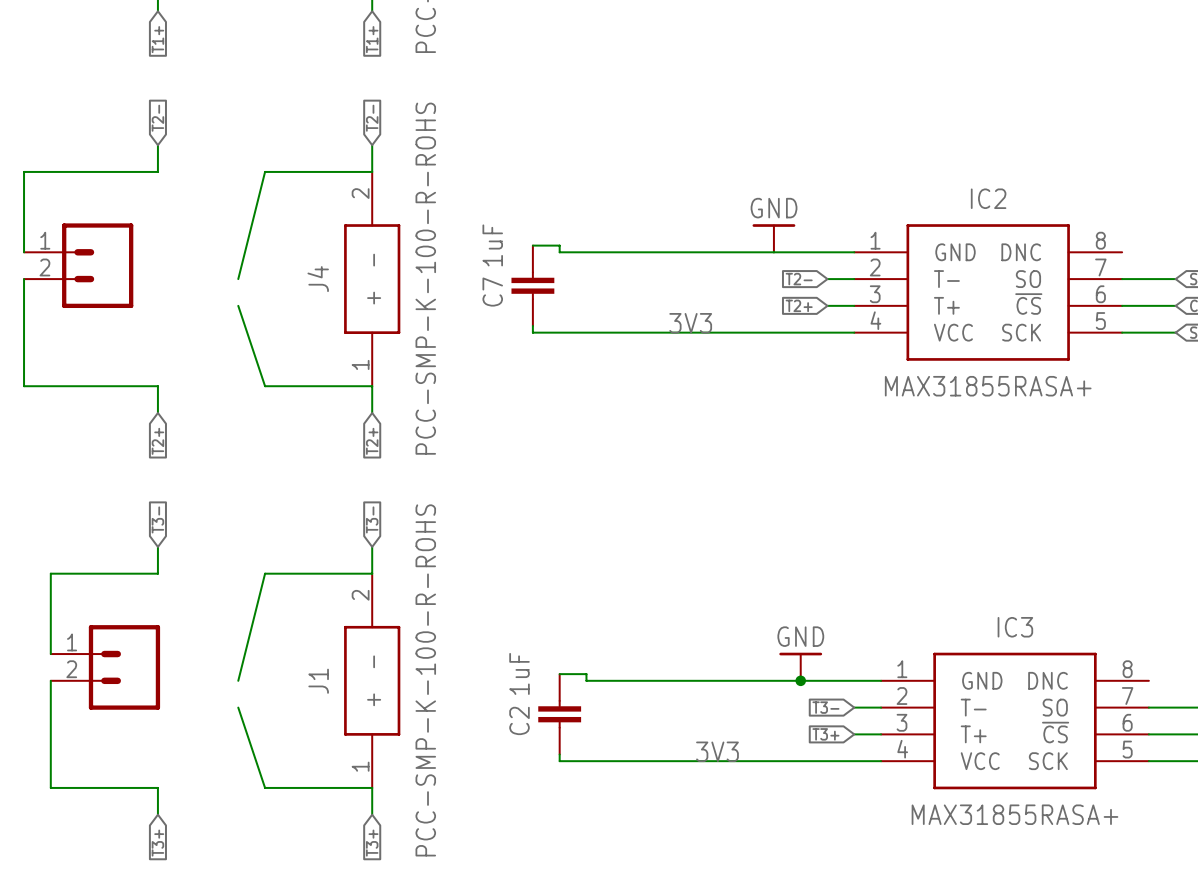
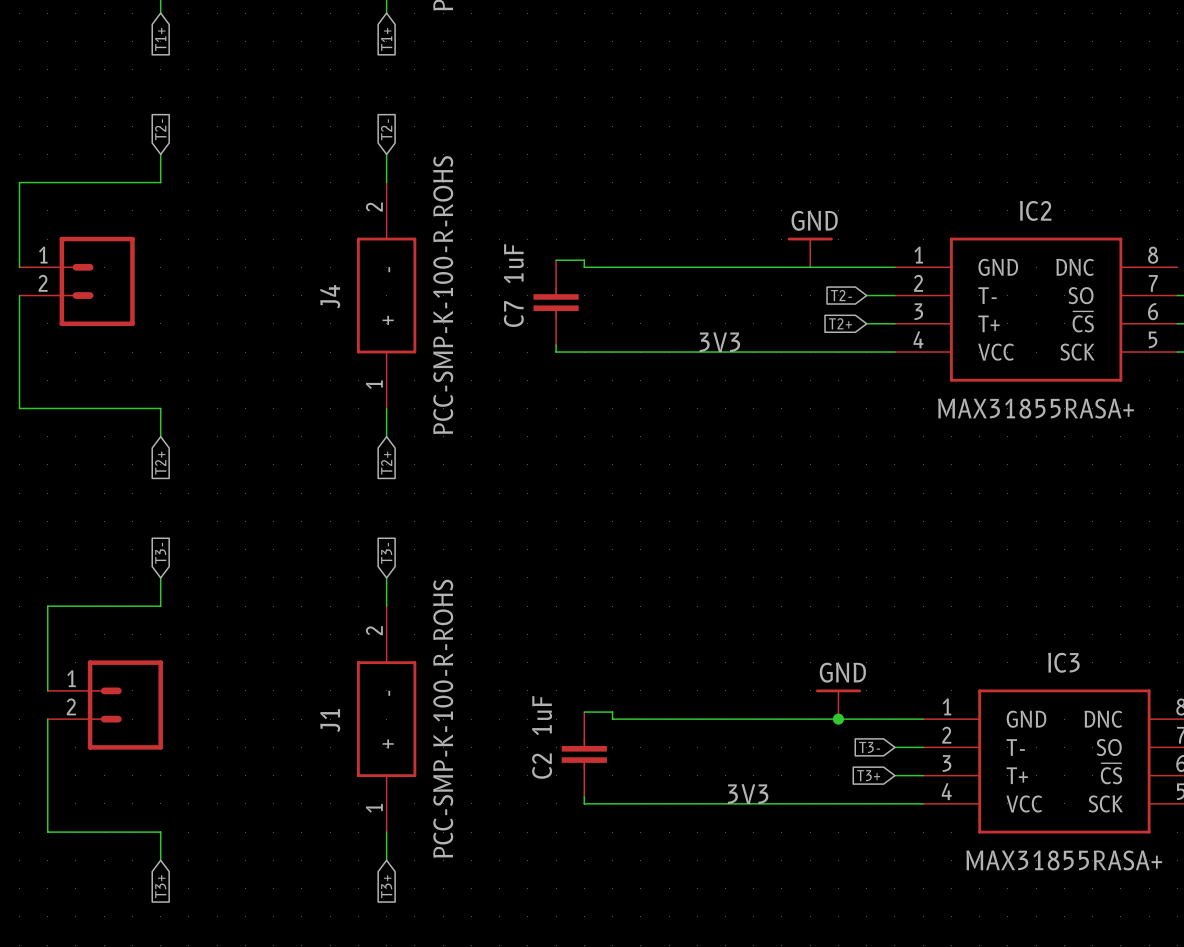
wire: (372, 171) (265, 171) (238, 279) -> none
wire: (238, 305) (265, 386) (372, 386) -> none
wire: (372, 573) (265, 573) (238, 680) -> none
wire: (238, 707) (265, 787) (372, 787) -> none

